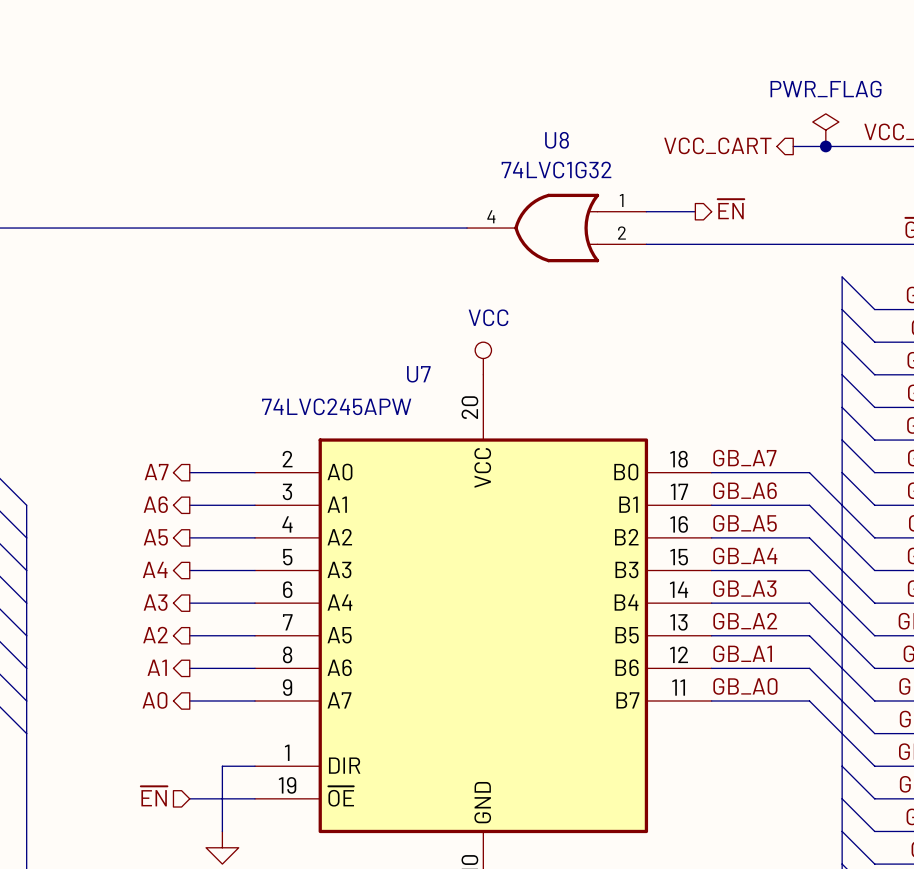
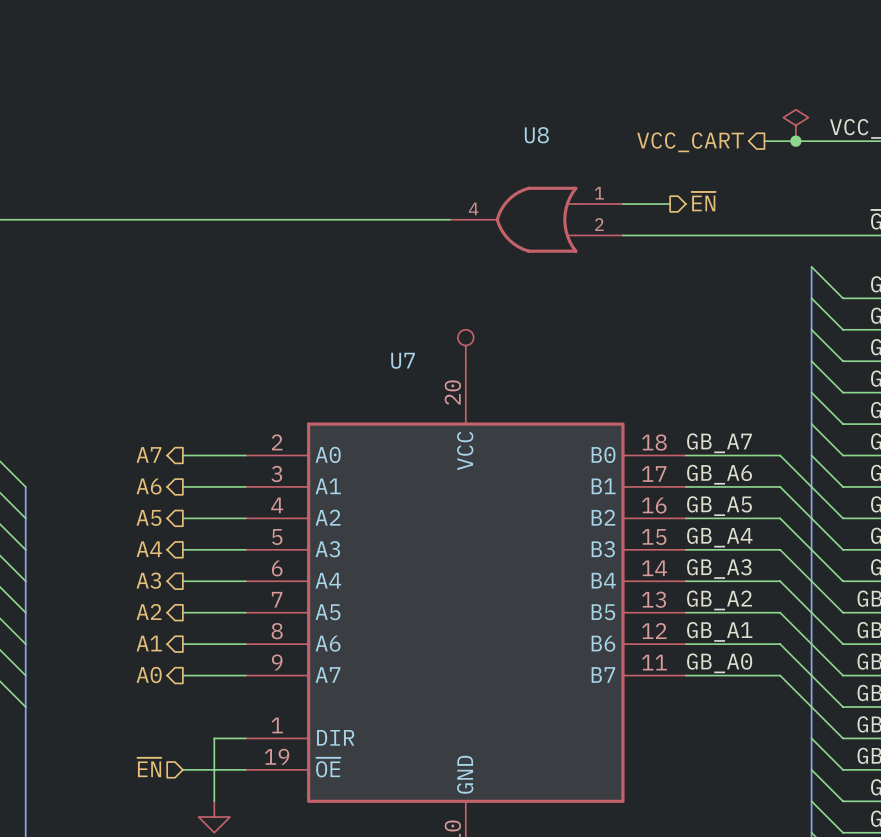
power symbol text: PWR_FLAG (826, 89) -> none
U8 value: 74LVC1G32 (556, 170) -> none
power symbol text: VCC (488, 317) -> none
U7 value: 74LVC245APW (336, 406) -> none

